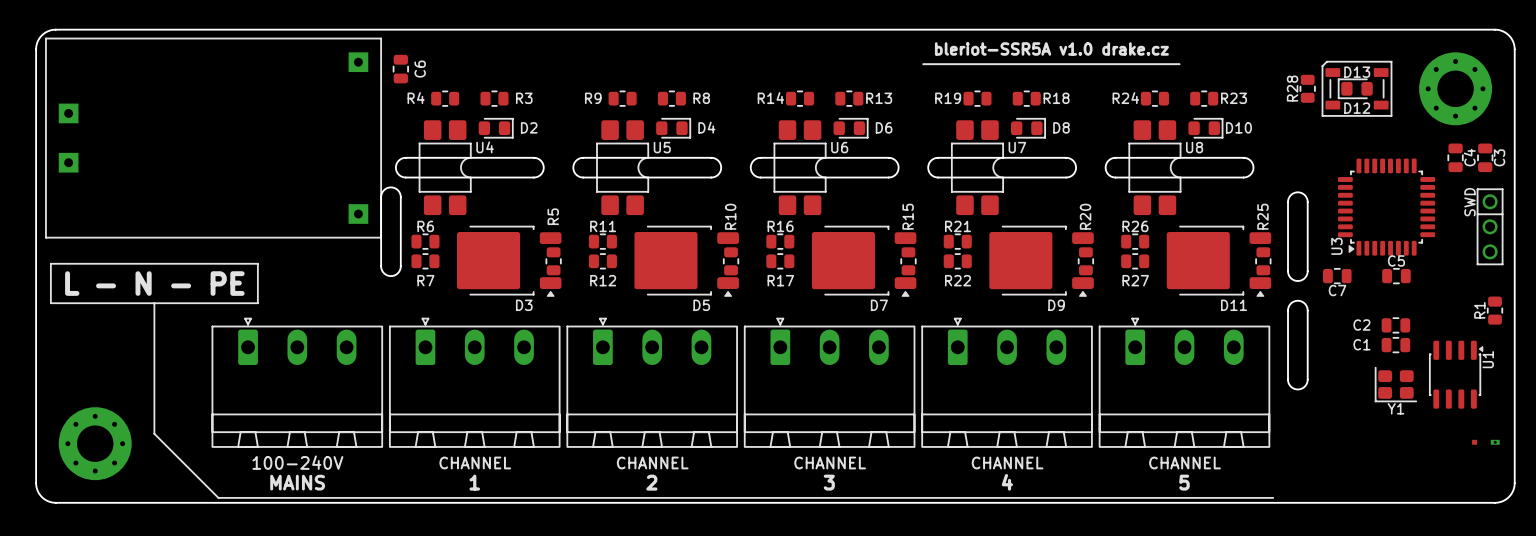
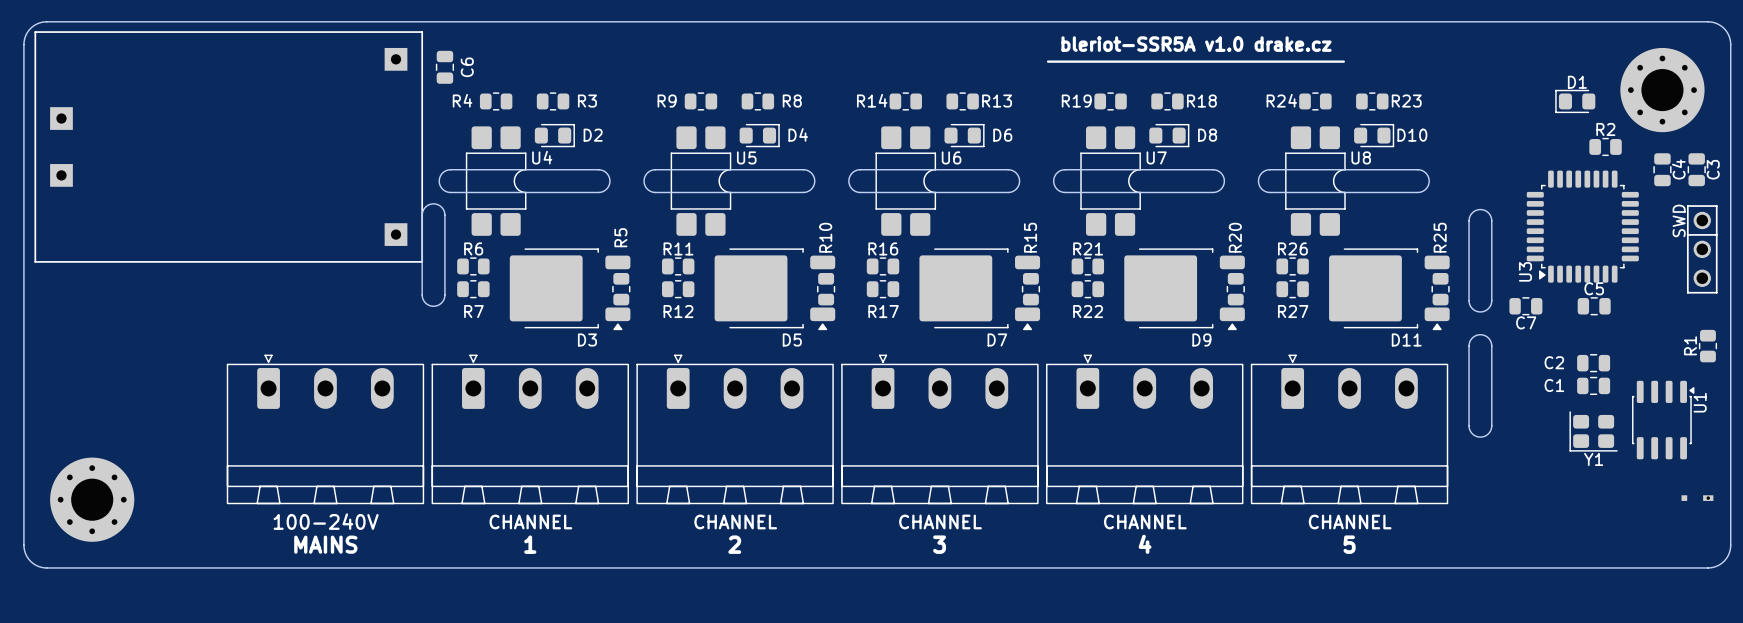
R28: (1307, 88) -> none
D13: (1355, 88) -> none
D12: (1356, 88) -> none
D1: none -> (1575, 101)
R2: none -> (1605, 146)
line: (50, 263) (257, 263) (257, 303) (50, 303) (50, 263) -> none
text: L - N - PE (154, 283) -> none
line: (154, 303) (154, 433) (218, 497) (1273, 497) -> none

